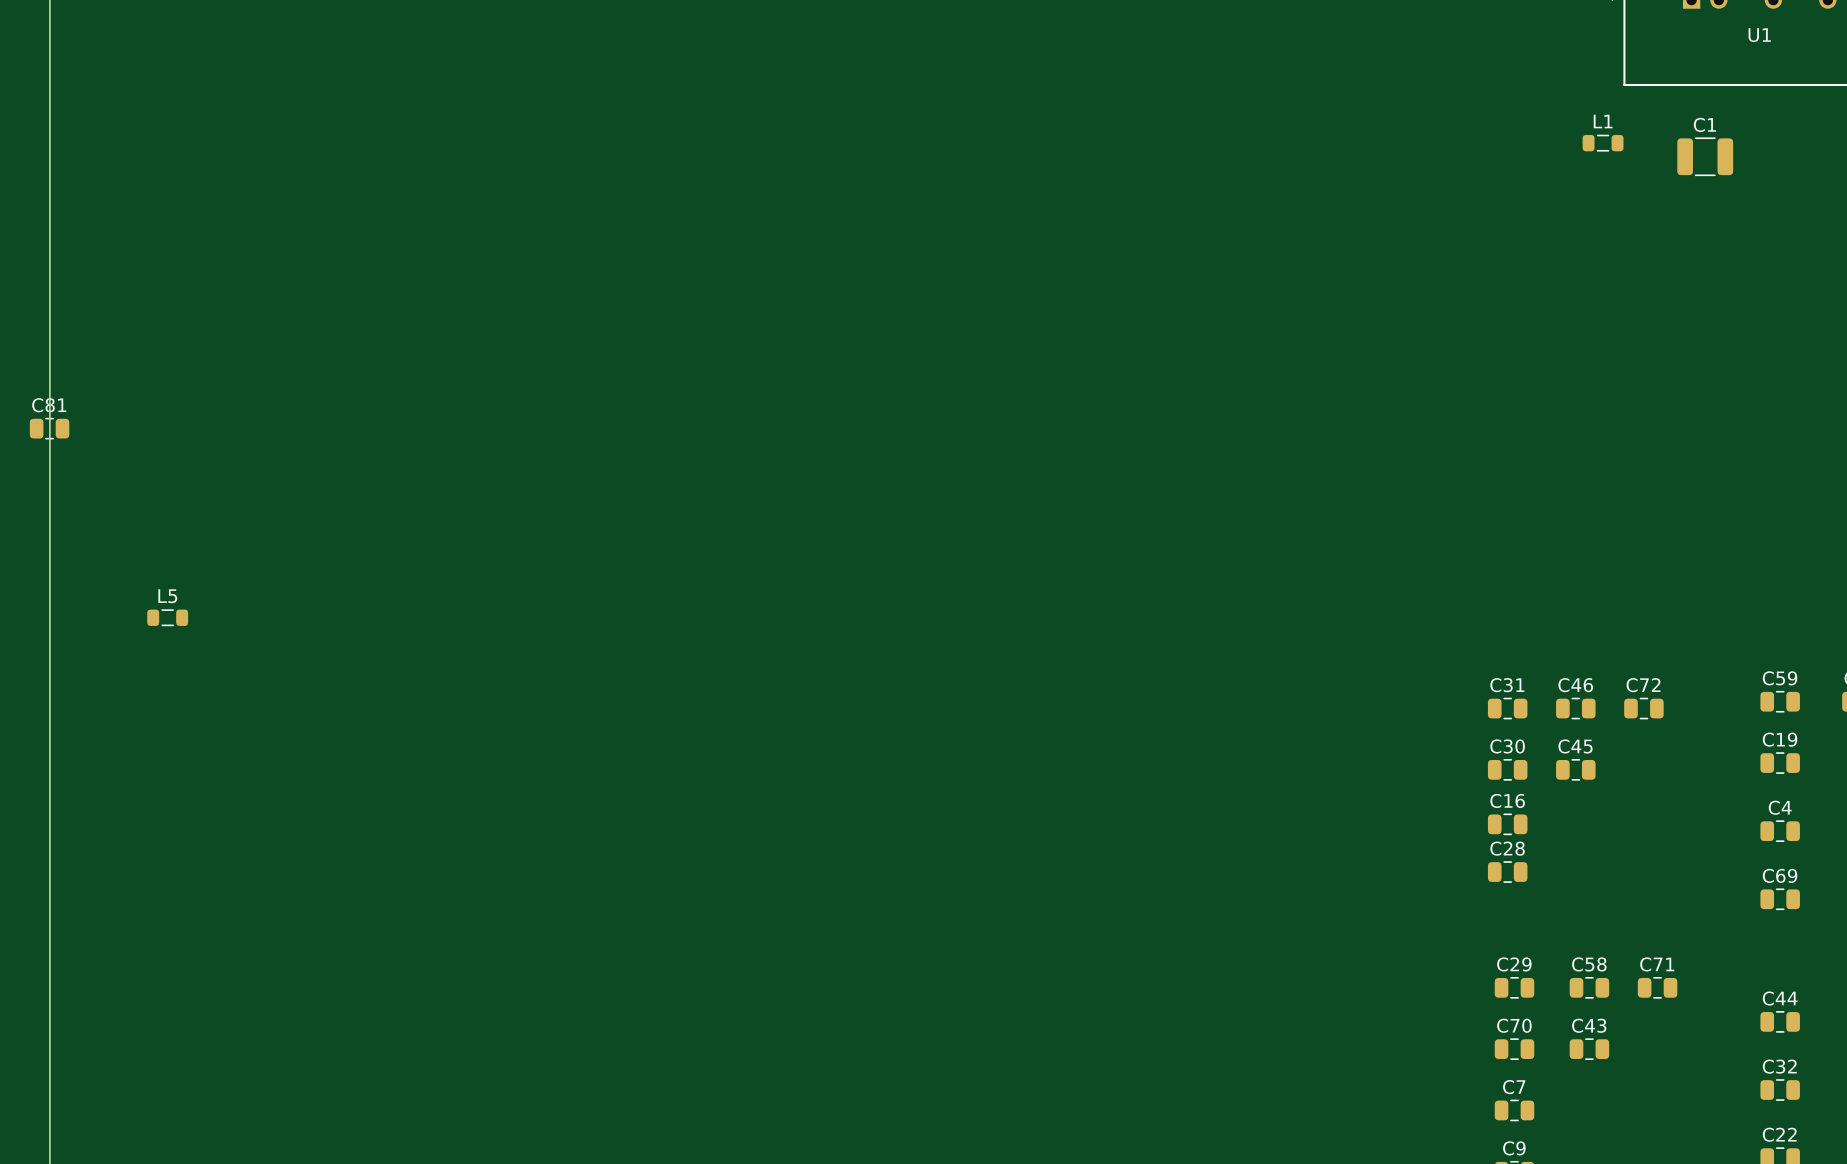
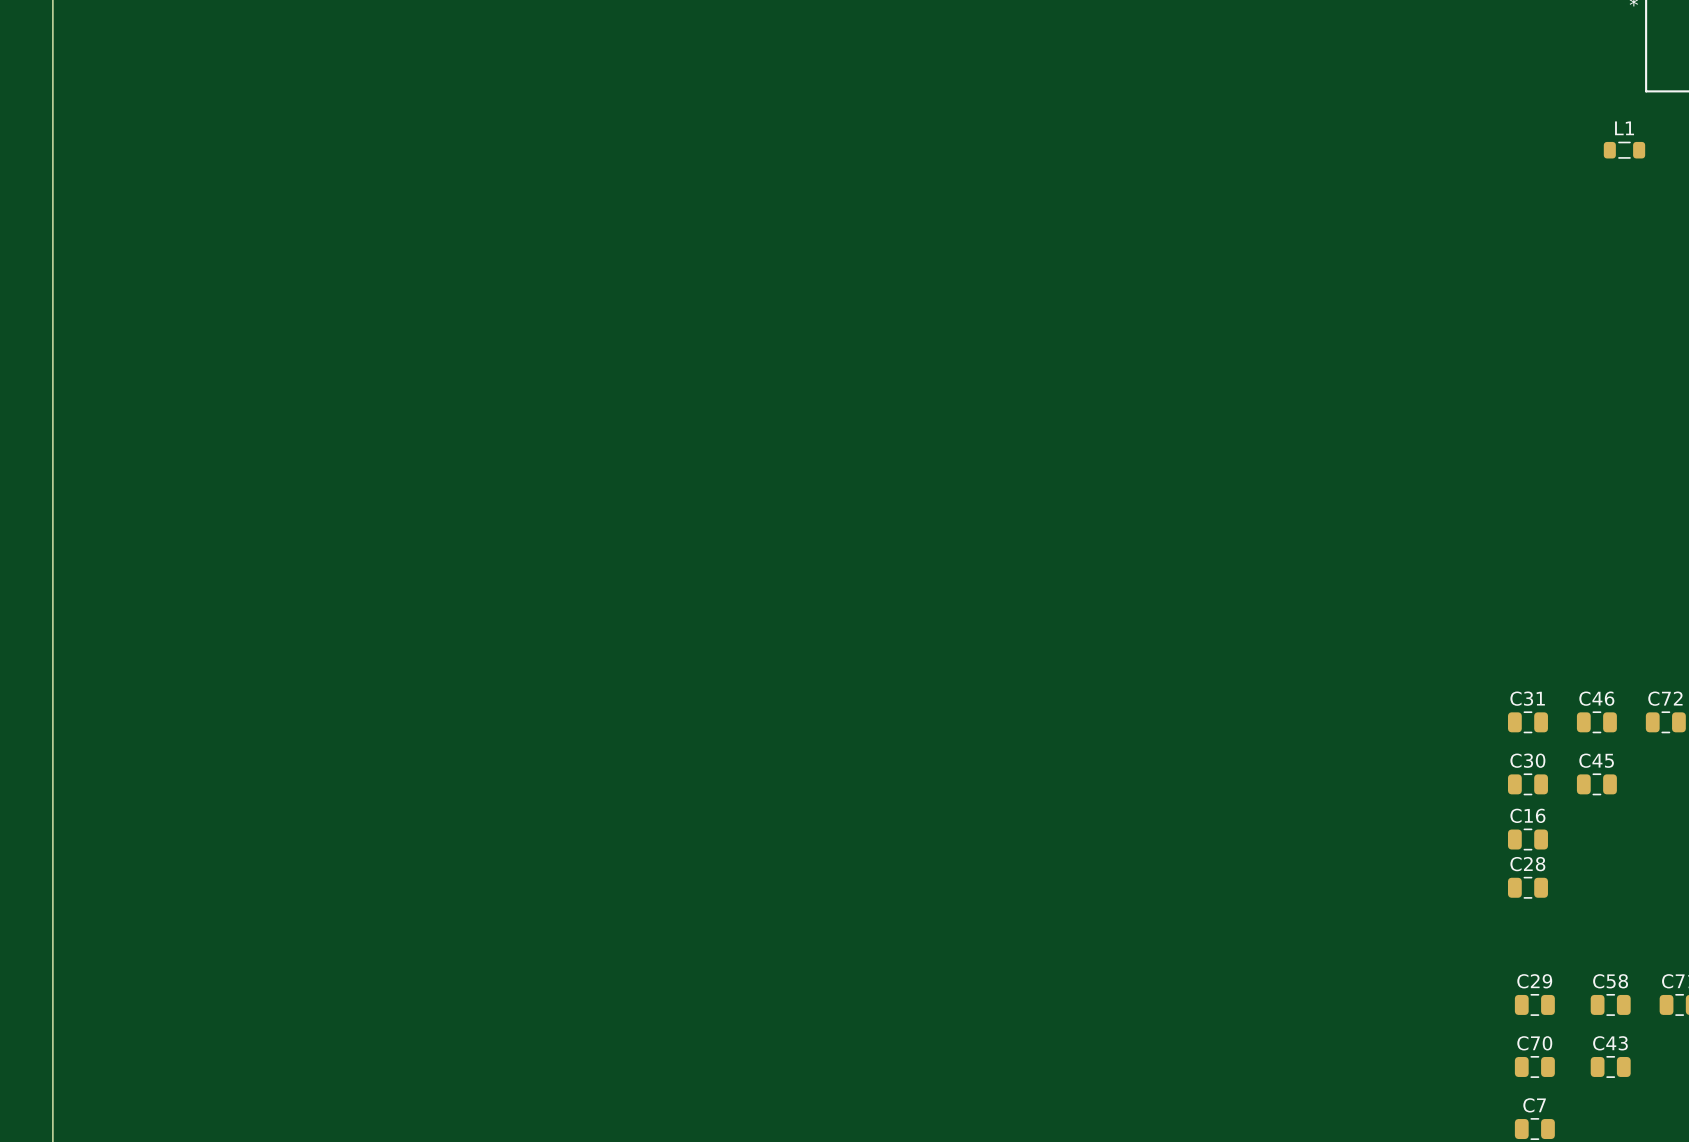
C81: (49, 428) -> none
L5: (167, 617) -> none

